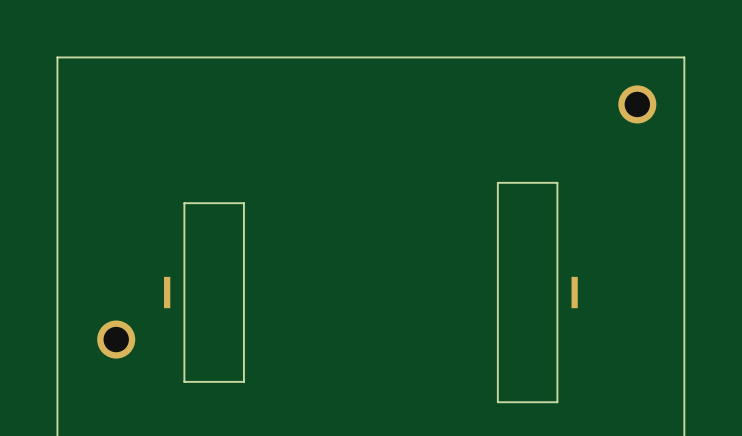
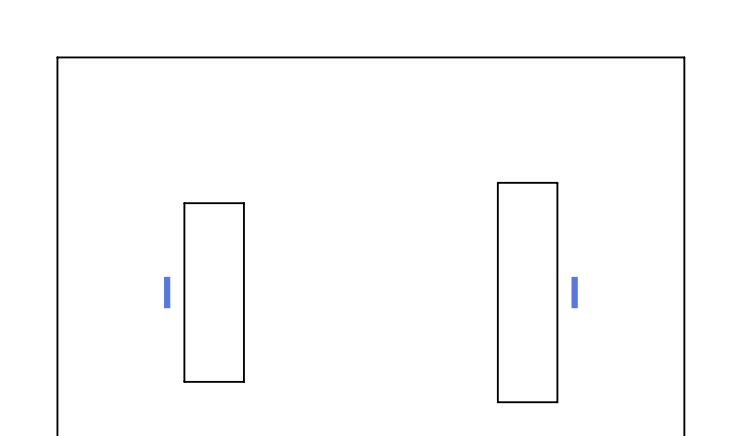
part: (637, 104) -> none
part: (116, 339) -> none

